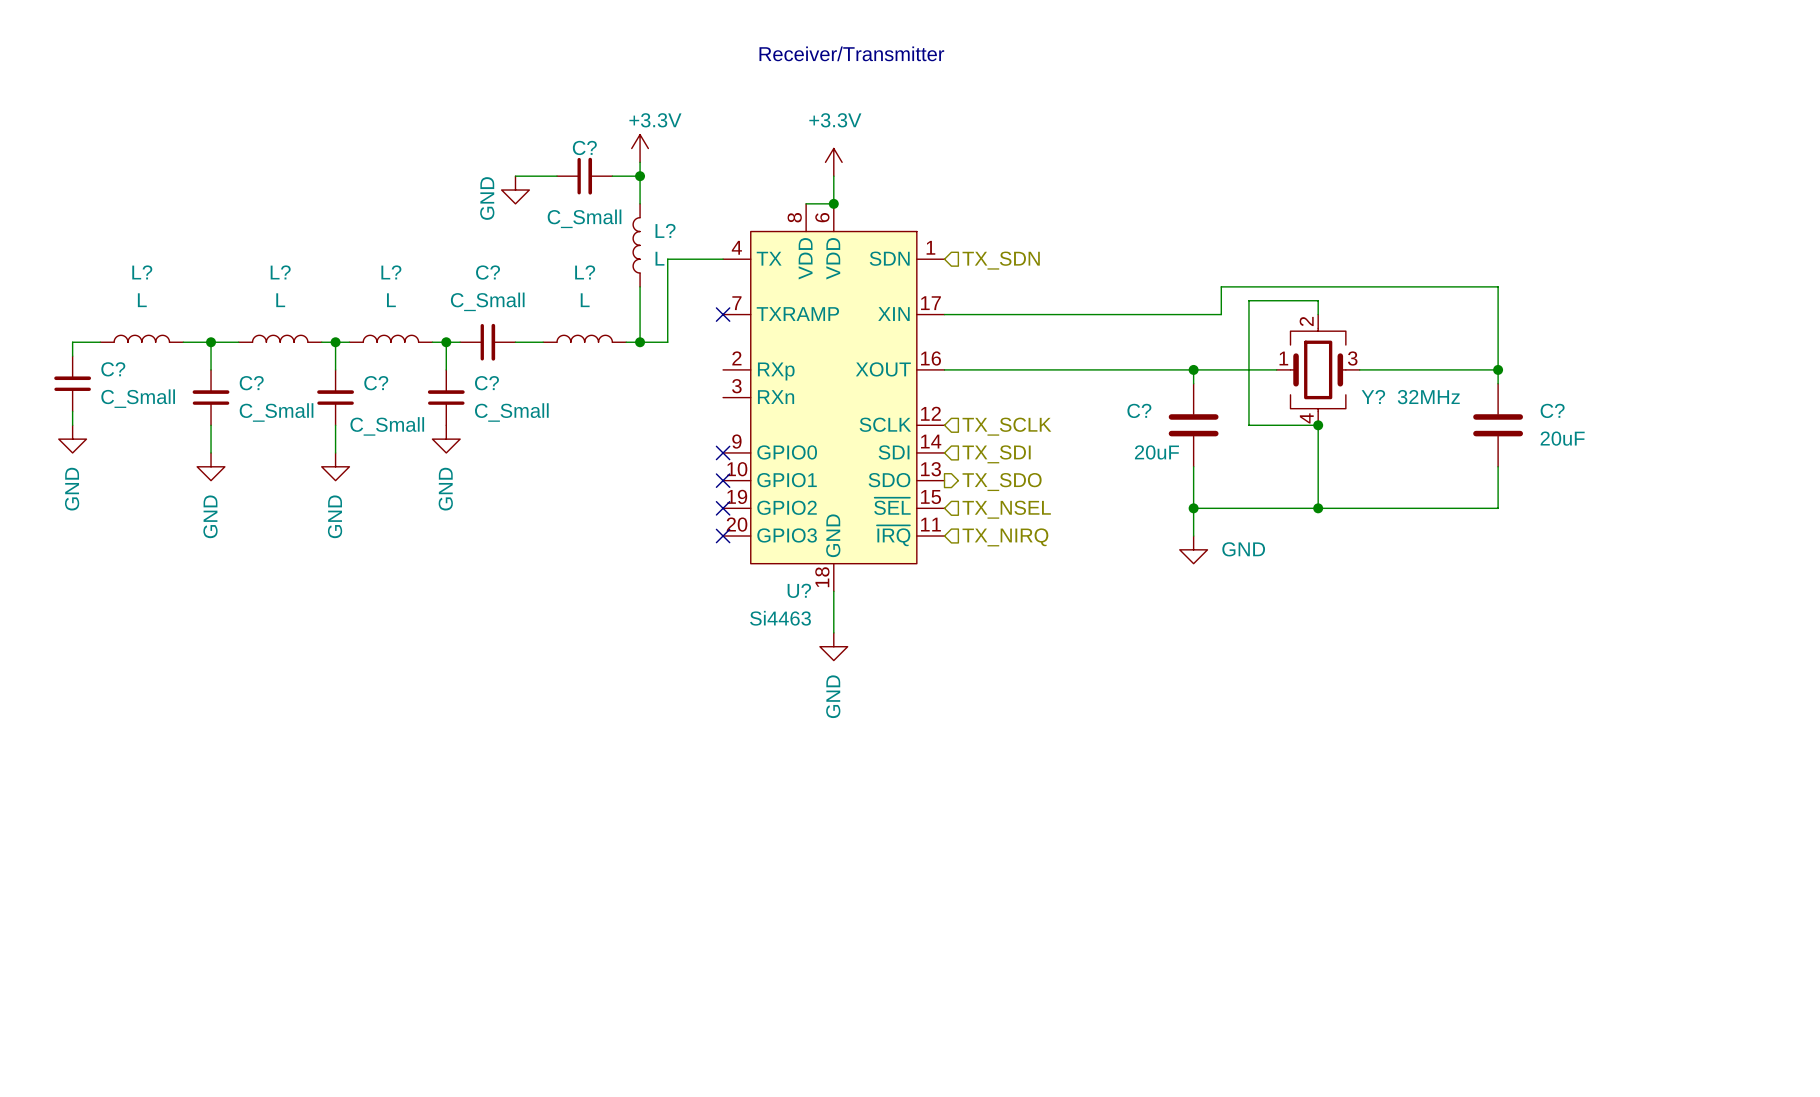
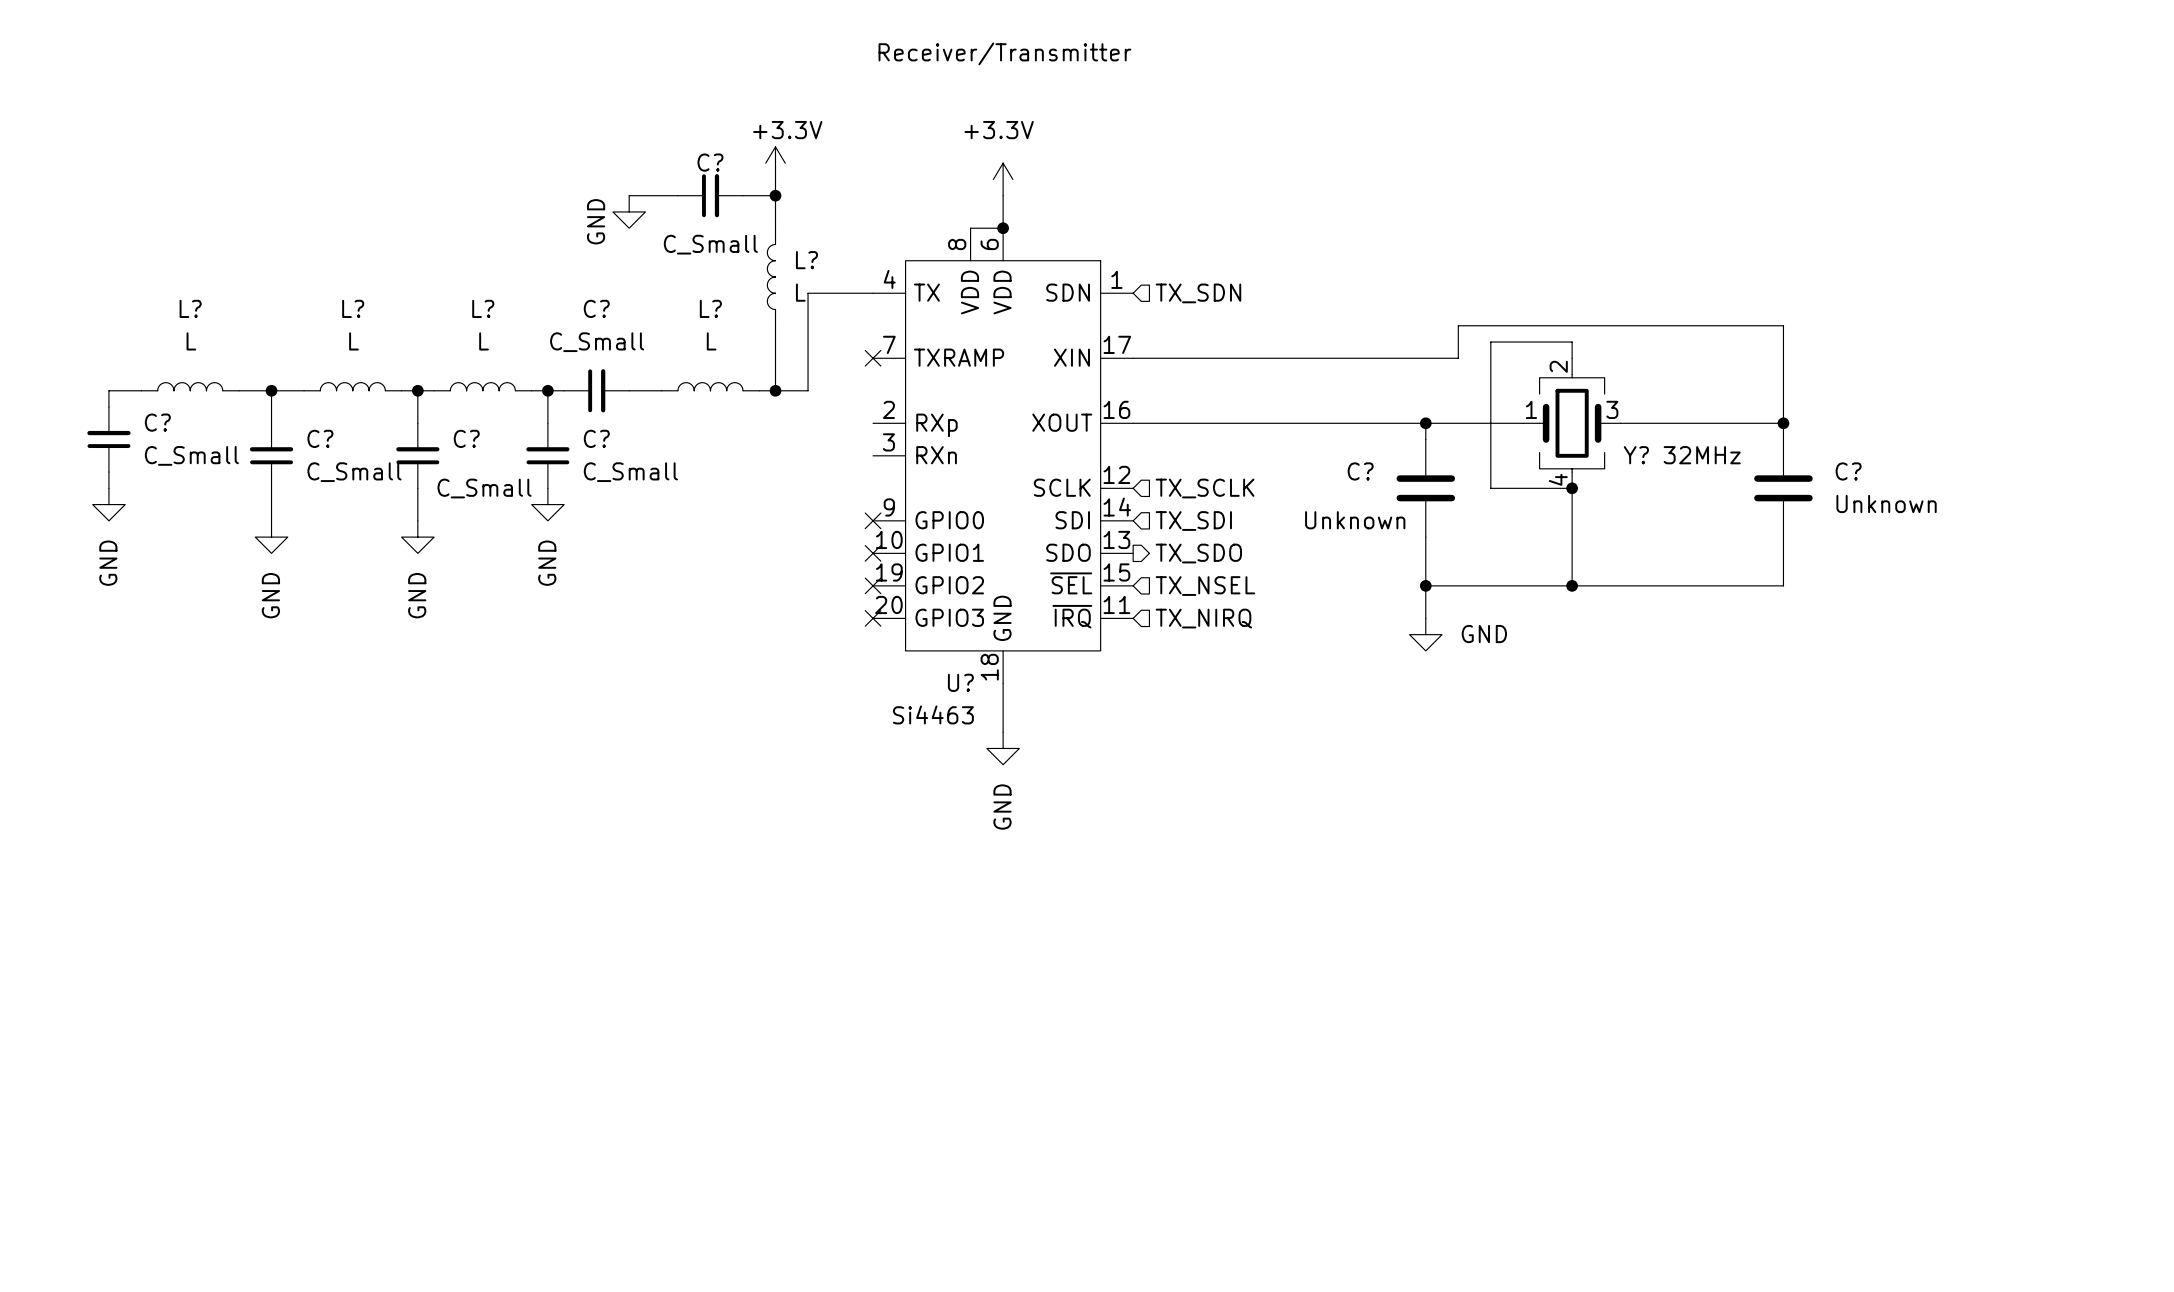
C? value: 20uF (1562, 438) -> Unknown (1886, 503)
C? value: 20uF (1156, 452) -> Unknown (1355, 520)

